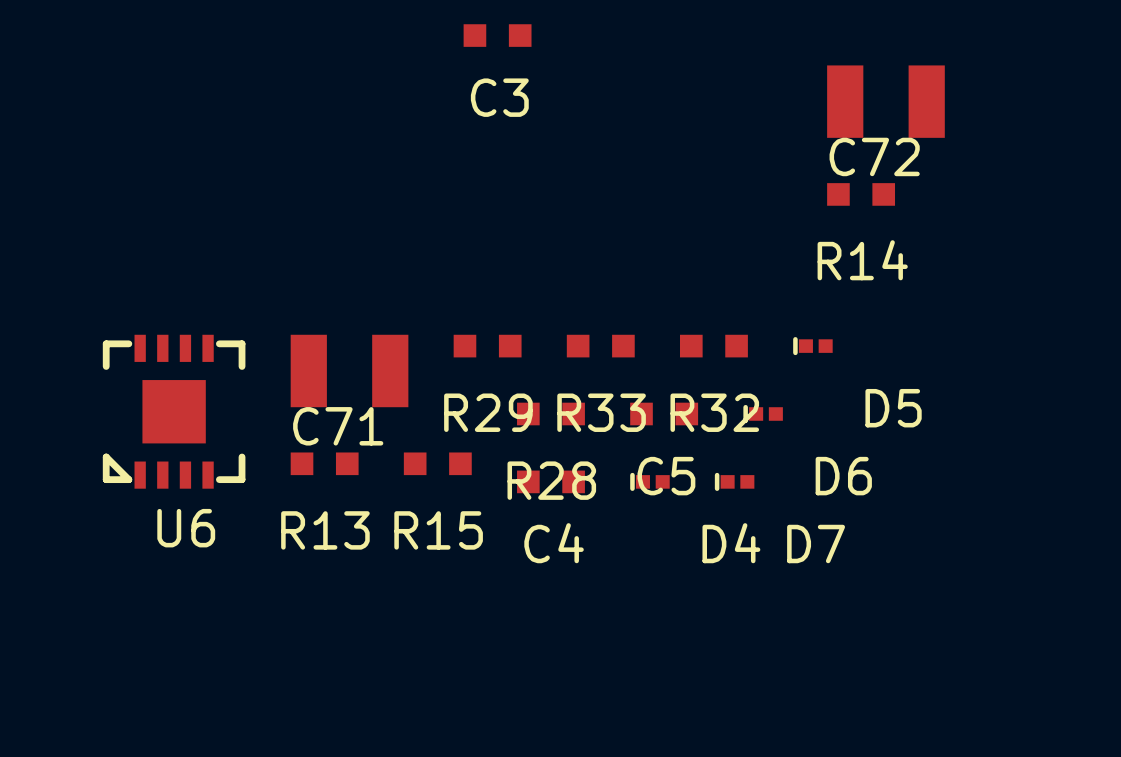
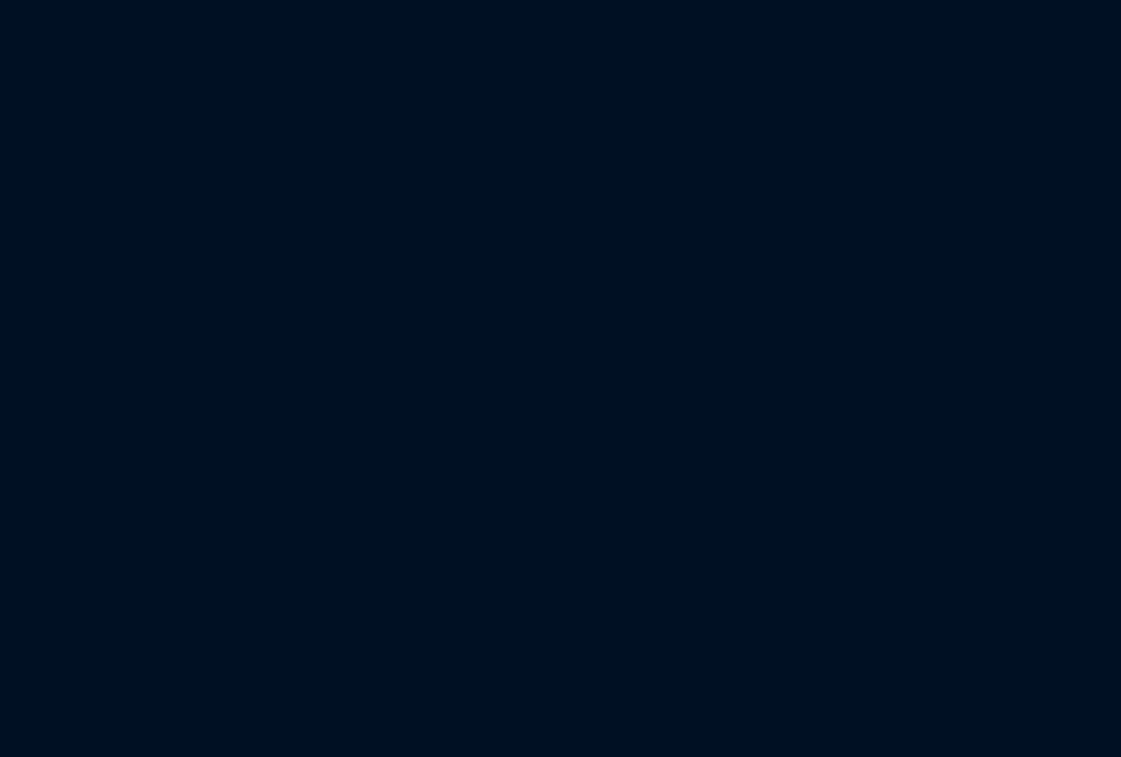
C3: (497, 35) -> none
C72: (885, 101) -> none
R14: (861, 194) -> none
R29: (487, 346) -> none
R33: (600, 346) -> none
R32: (713, 346) -> none
D5: (812, 346) -> none
C71: (349, 370) -> none
U6: (174, 411) -> none
R28: (550, 413) -> none
C5: (664, 413) -> none
D6: (763, 413) -> none
R13: (324, 463) -> none
R15: (437, 463) -> none
C4: (550, 481) -> none
D4: (649, 481) -> none
D7: (734, 481) -> none

